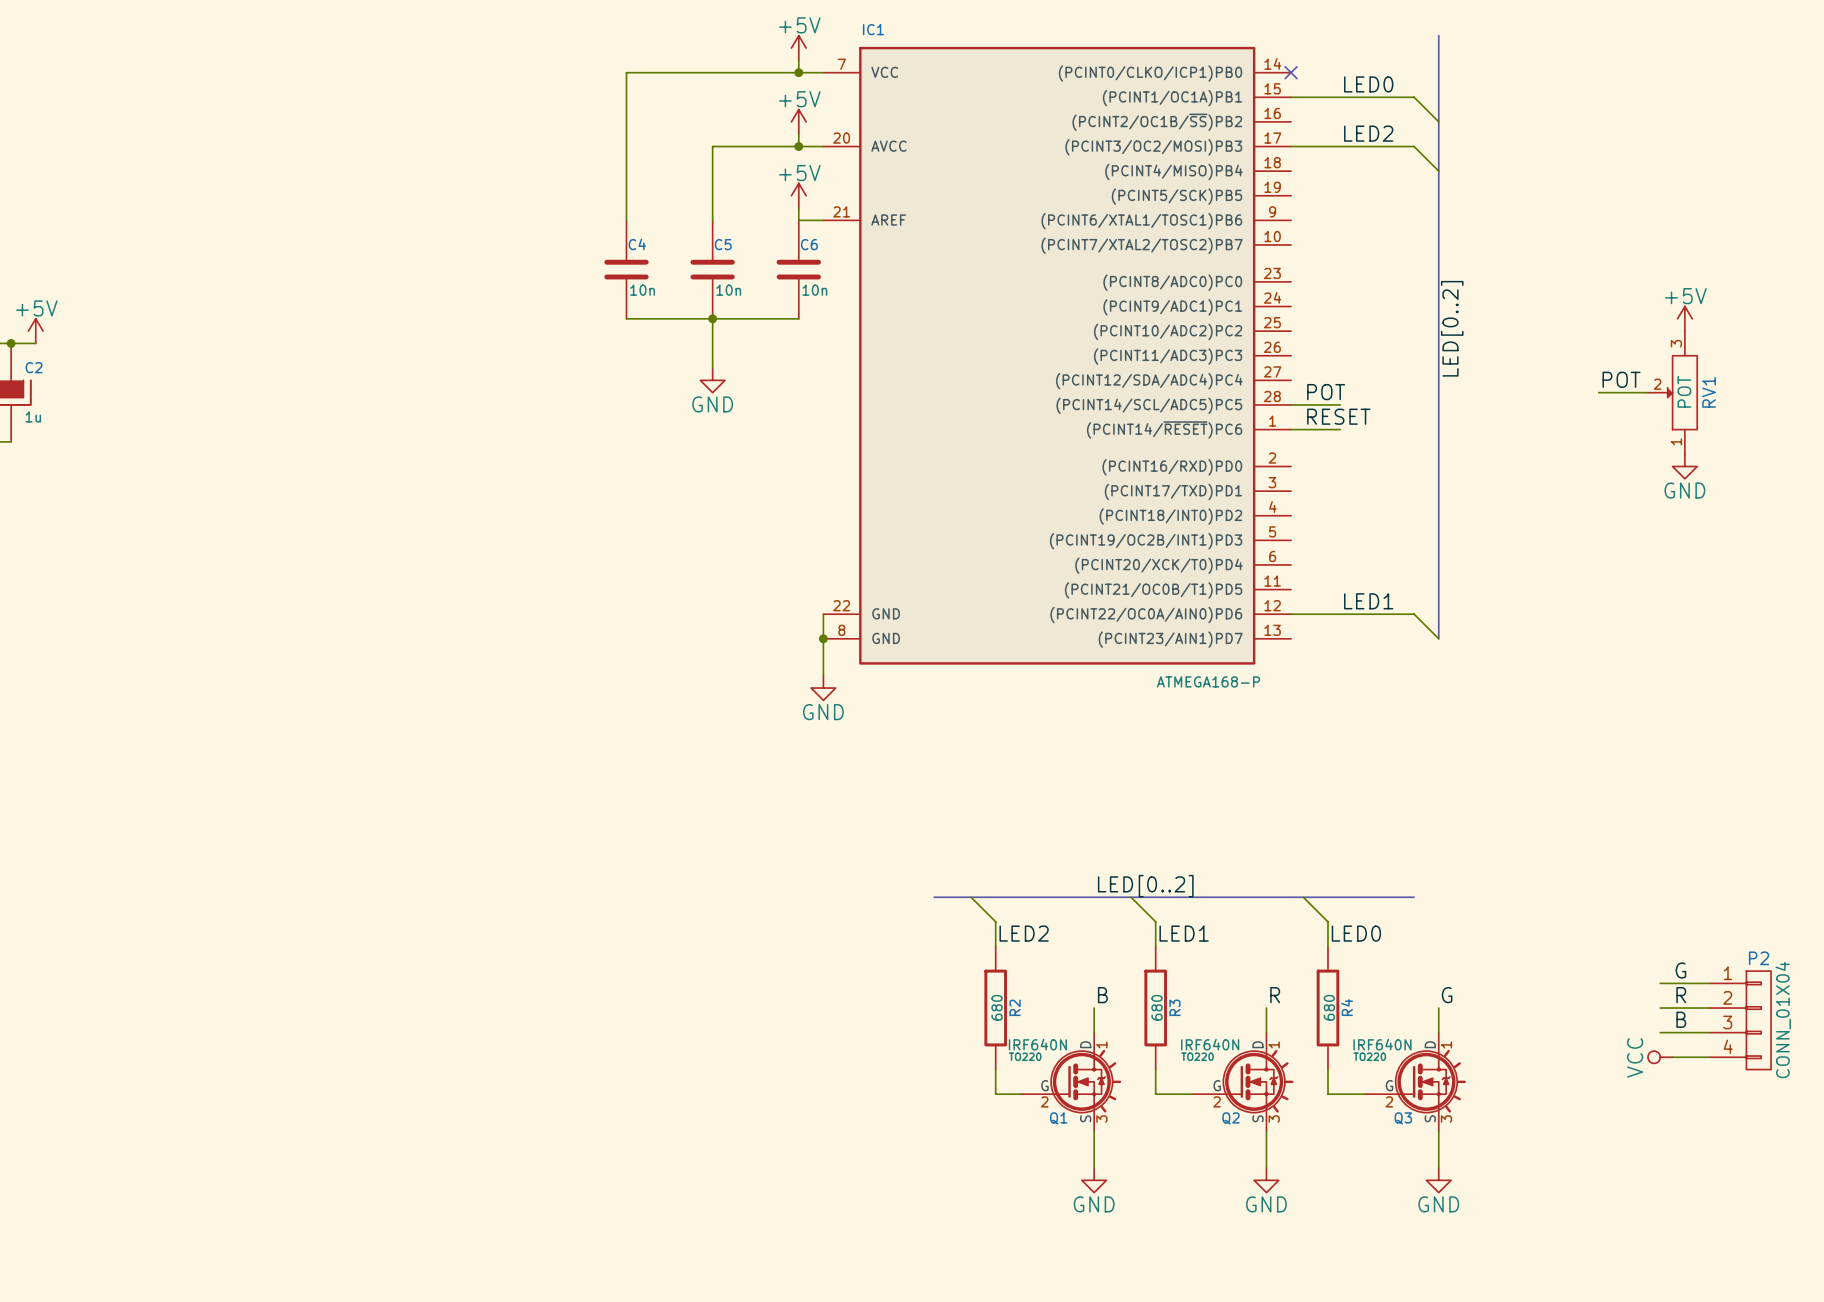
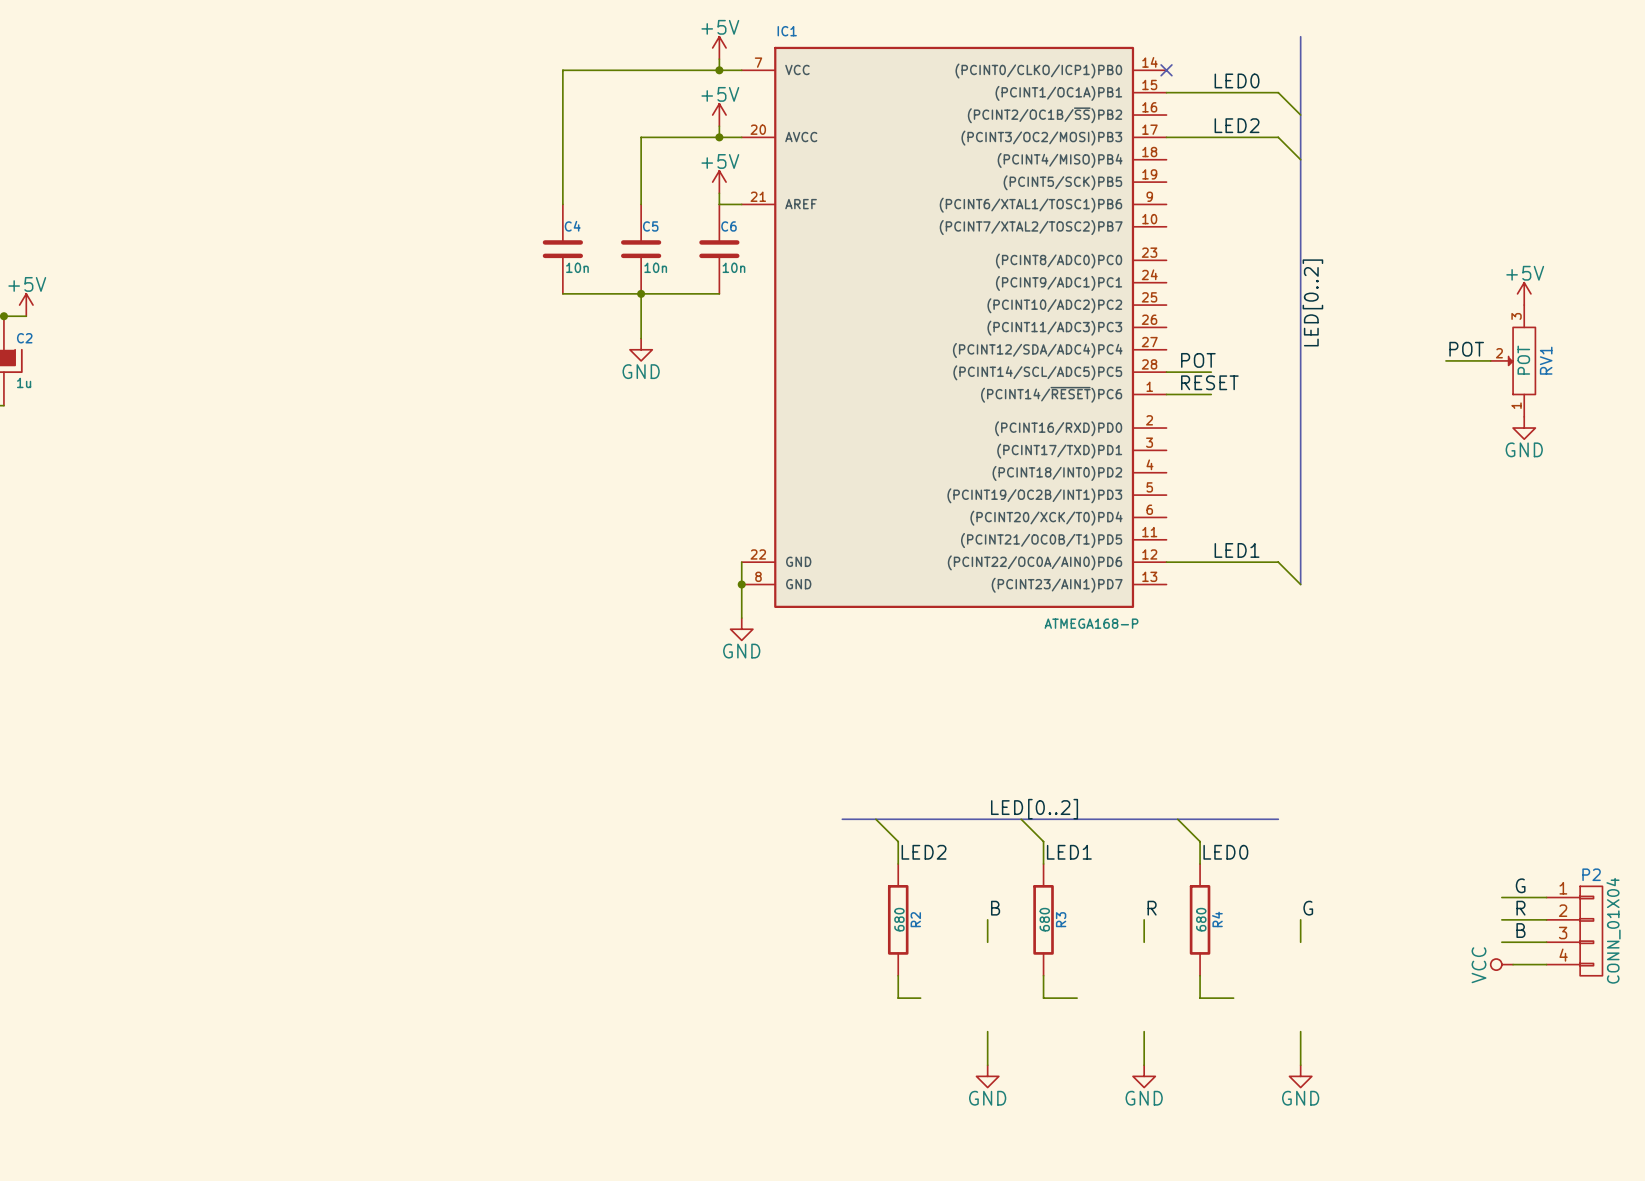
Q1: IRF640N (1070, 1081) -> none
Q2: IRF640N (1243, 1081) -> none
Q3: IRF640N (1415, 1081) -> none

